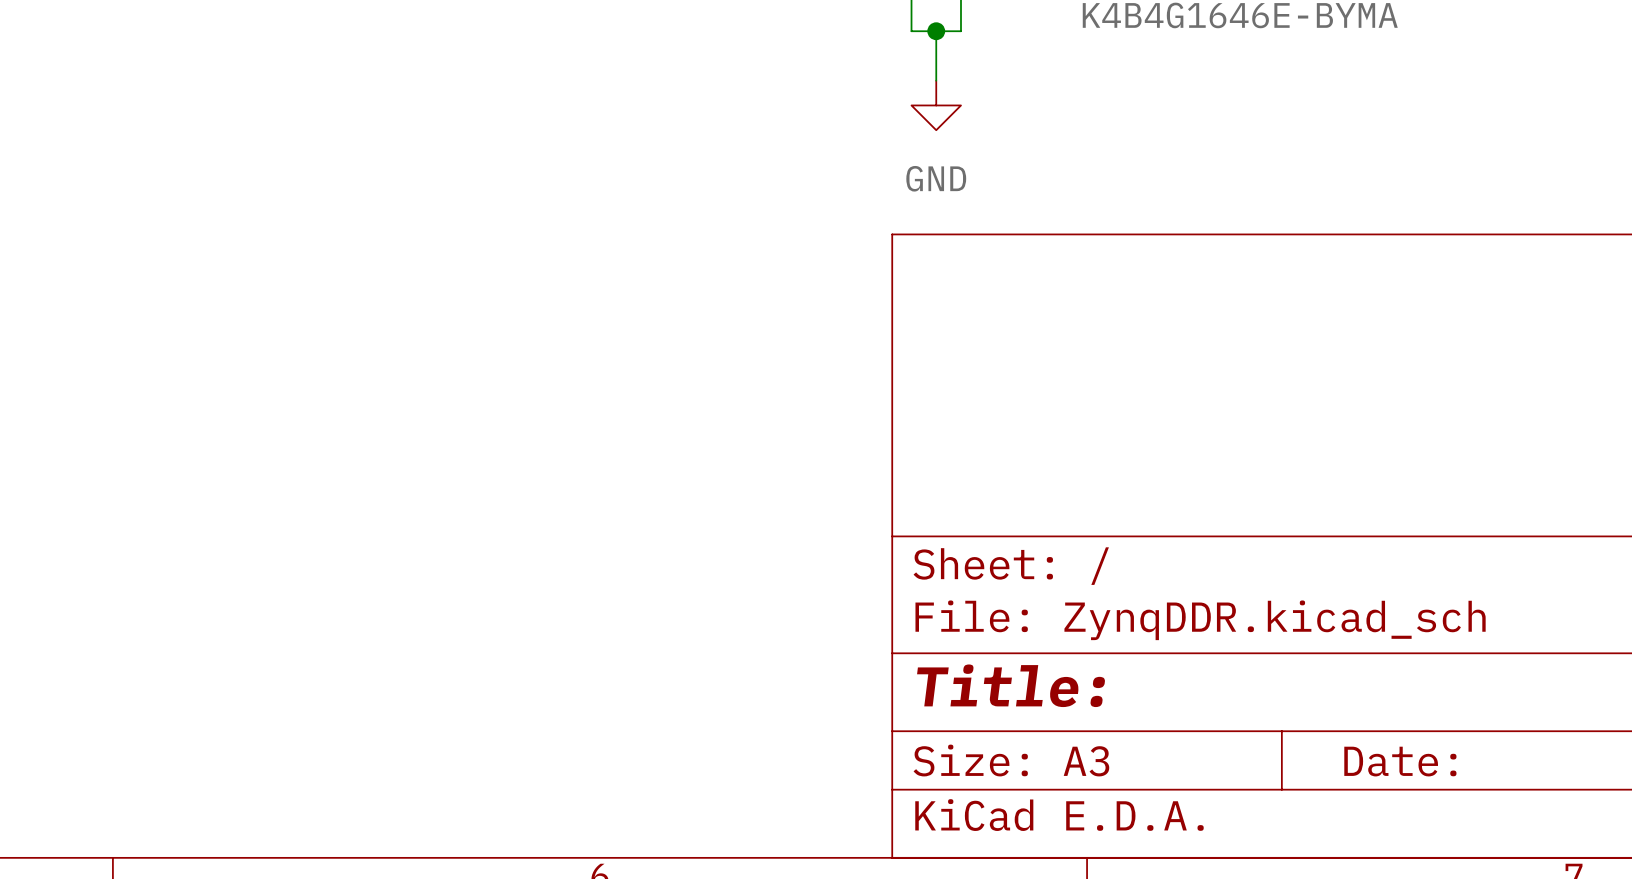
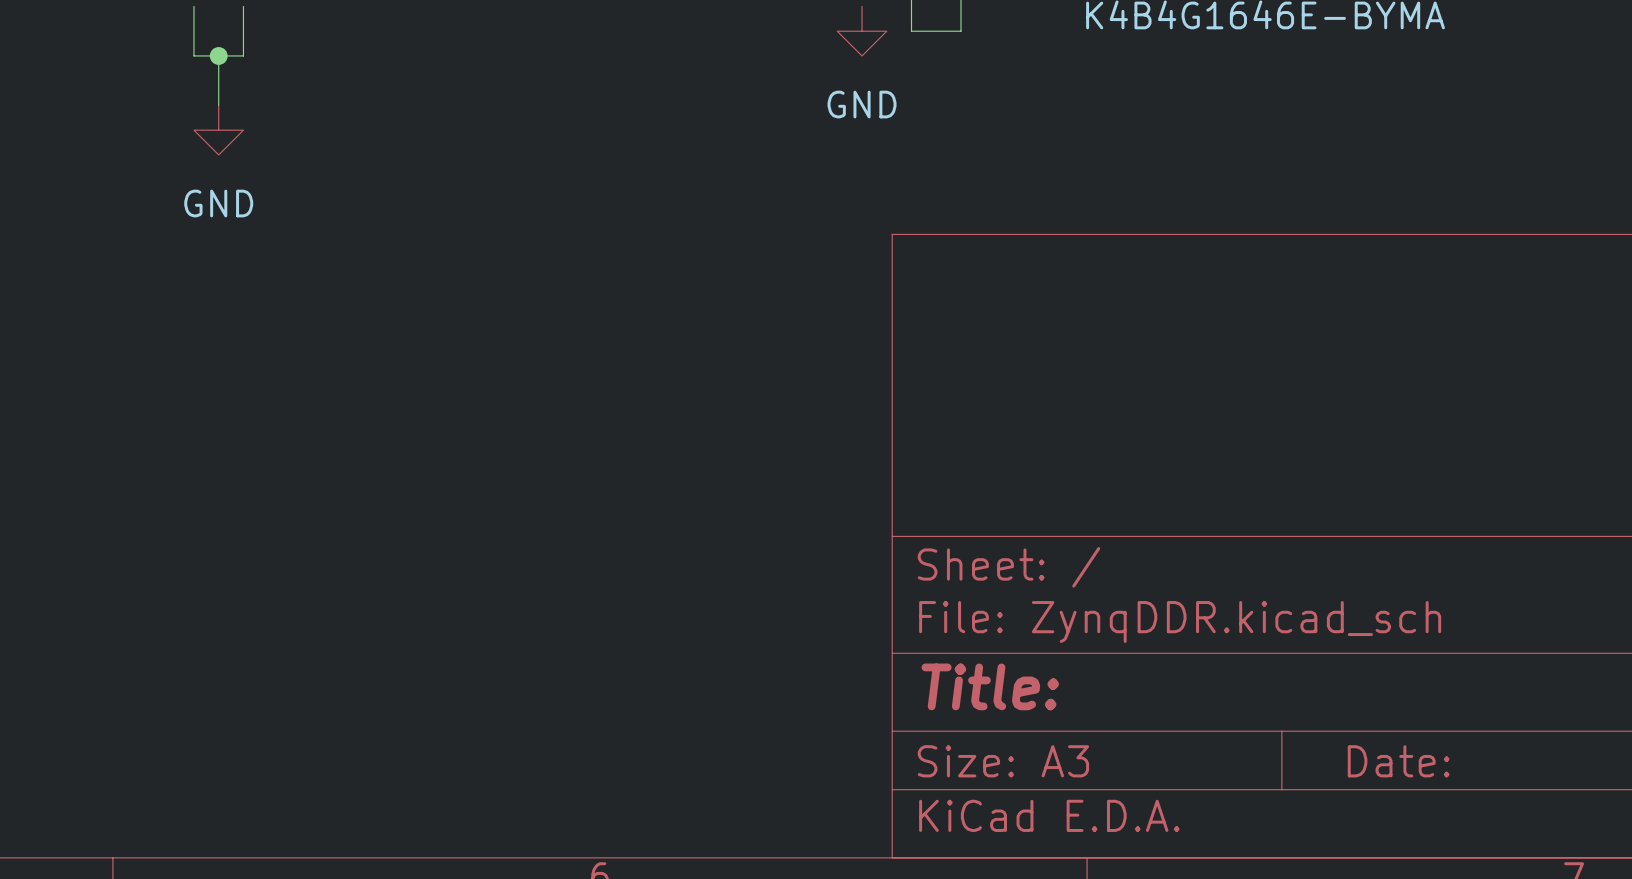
wire: none -> (193, 6) (193, 55) (243, 55) (243, 6)
wire: (936, 31) (936, 80) -> none
junction: (936, 31) -> none
wire: none -> (218, 55) (218, 105)
junction: none -> (218, 55)
power symbol position: GND (936, 105) -> GND (862, 31)
power symbol: none -> GND (218, 130)

